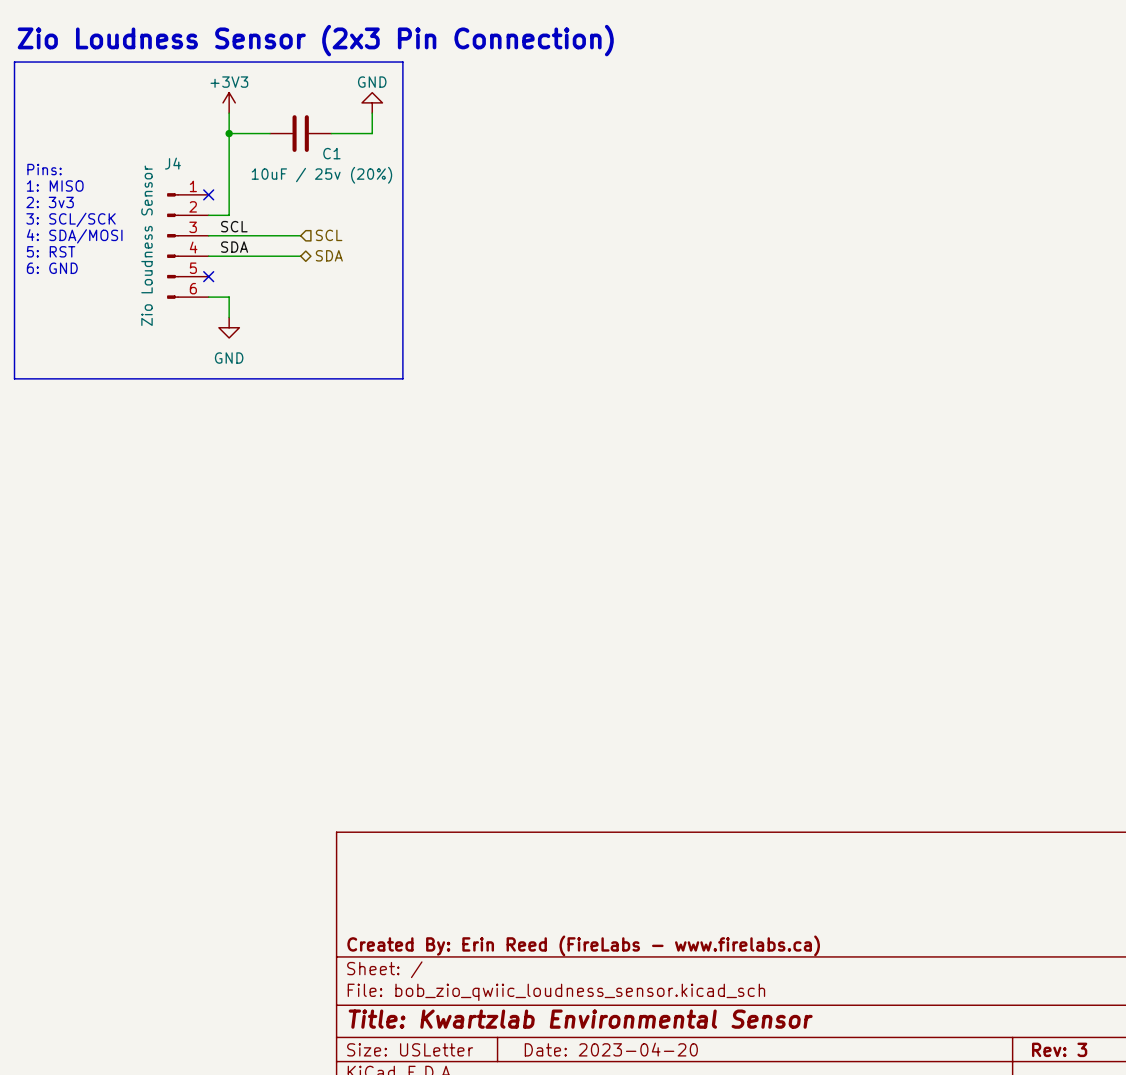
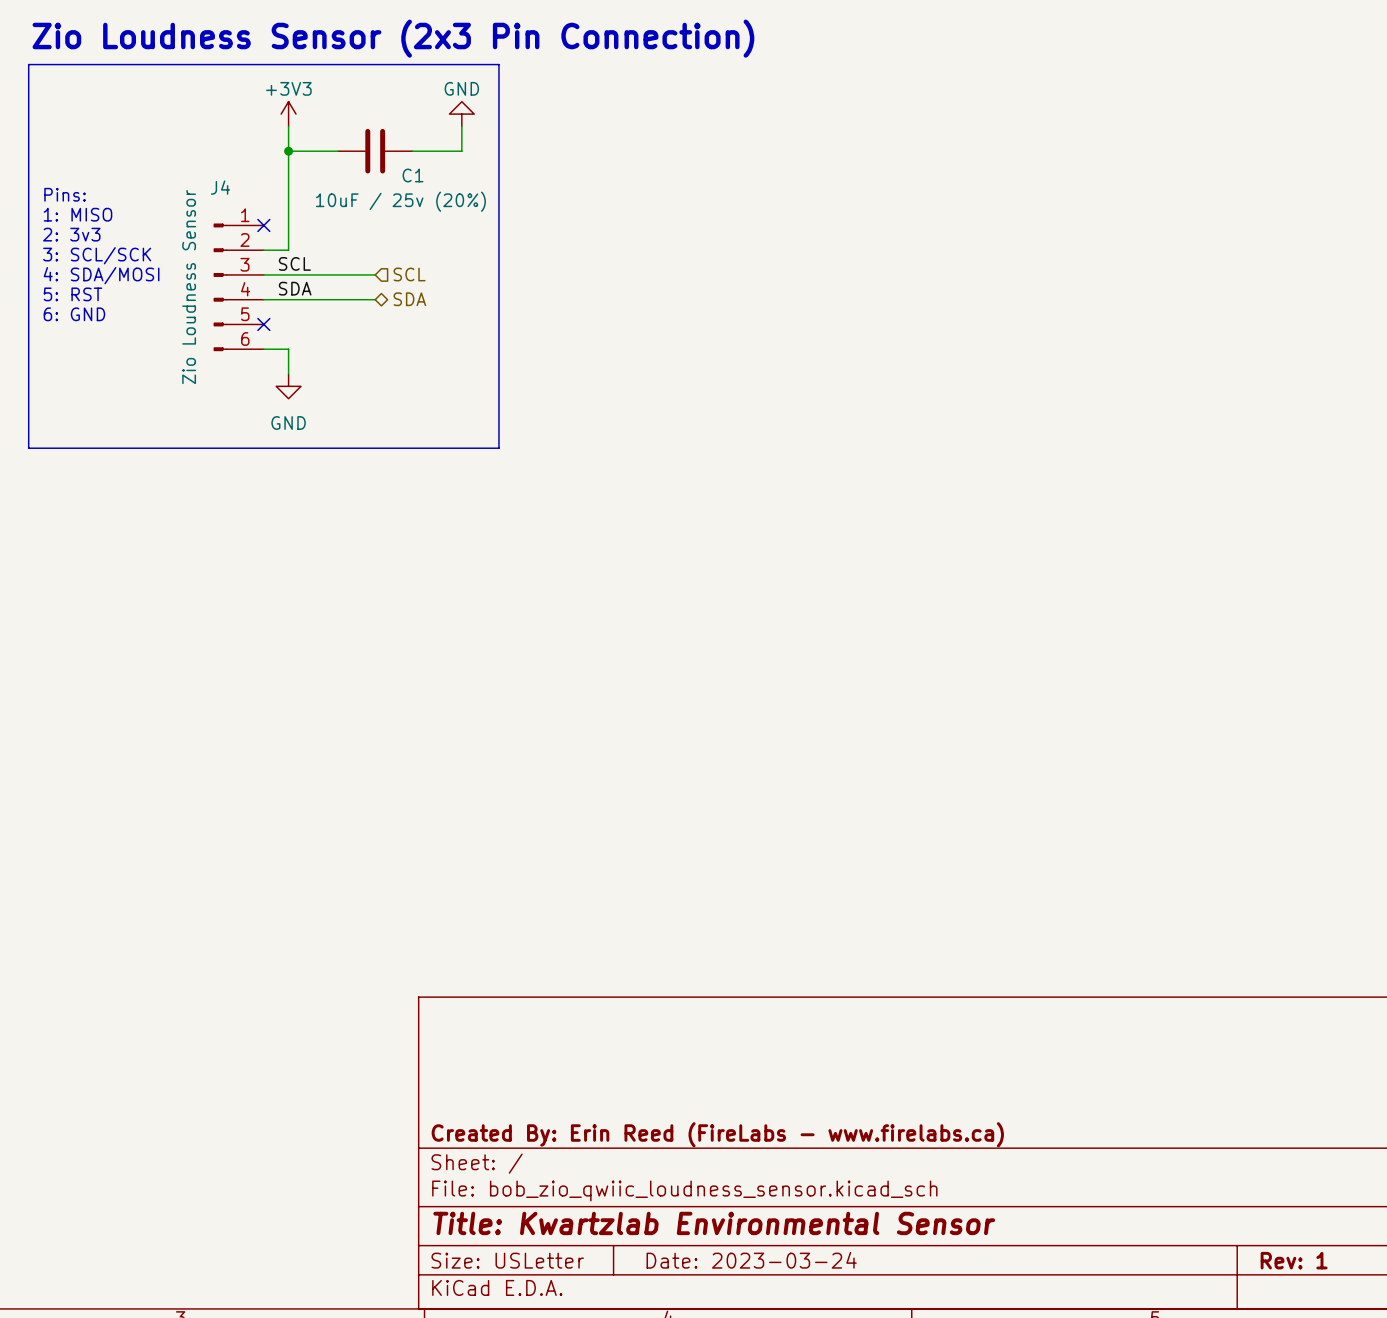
title block: Date: 2023-04-20 (611, 1049) -> Date: 2023-03-24 (751, 1260)
title block: Rev: 3 (1059, 1049) -> Rev: 1 (1294, 1260)

